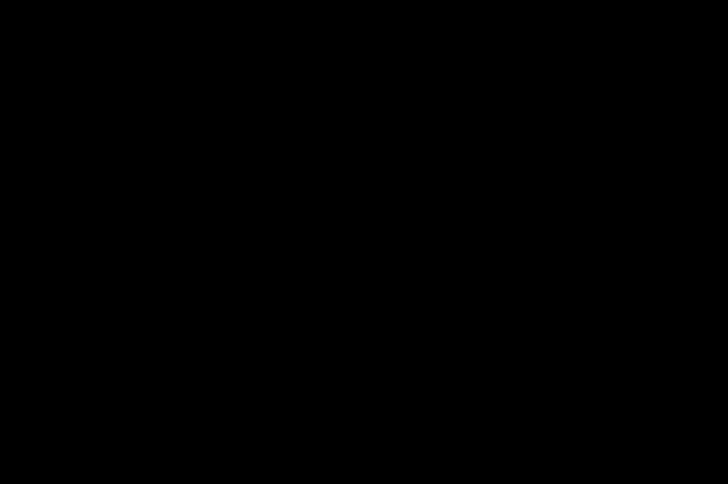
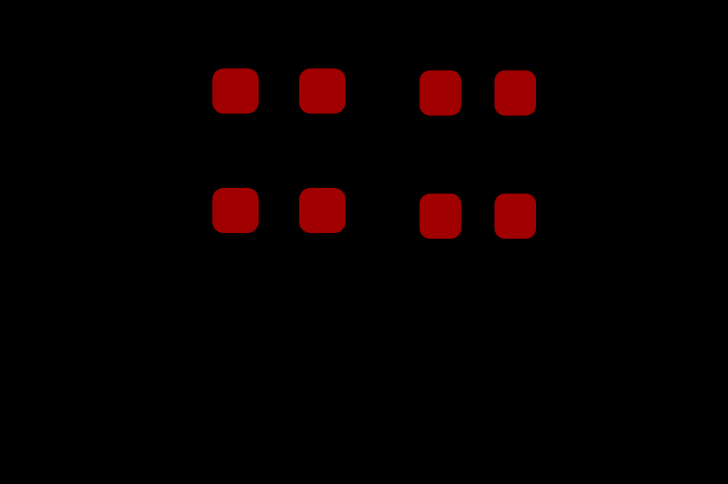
part: none -> (278, 91)
part: none -> (477, 92)
part: none -> (278, 210)
part: none -> (477, 216)

